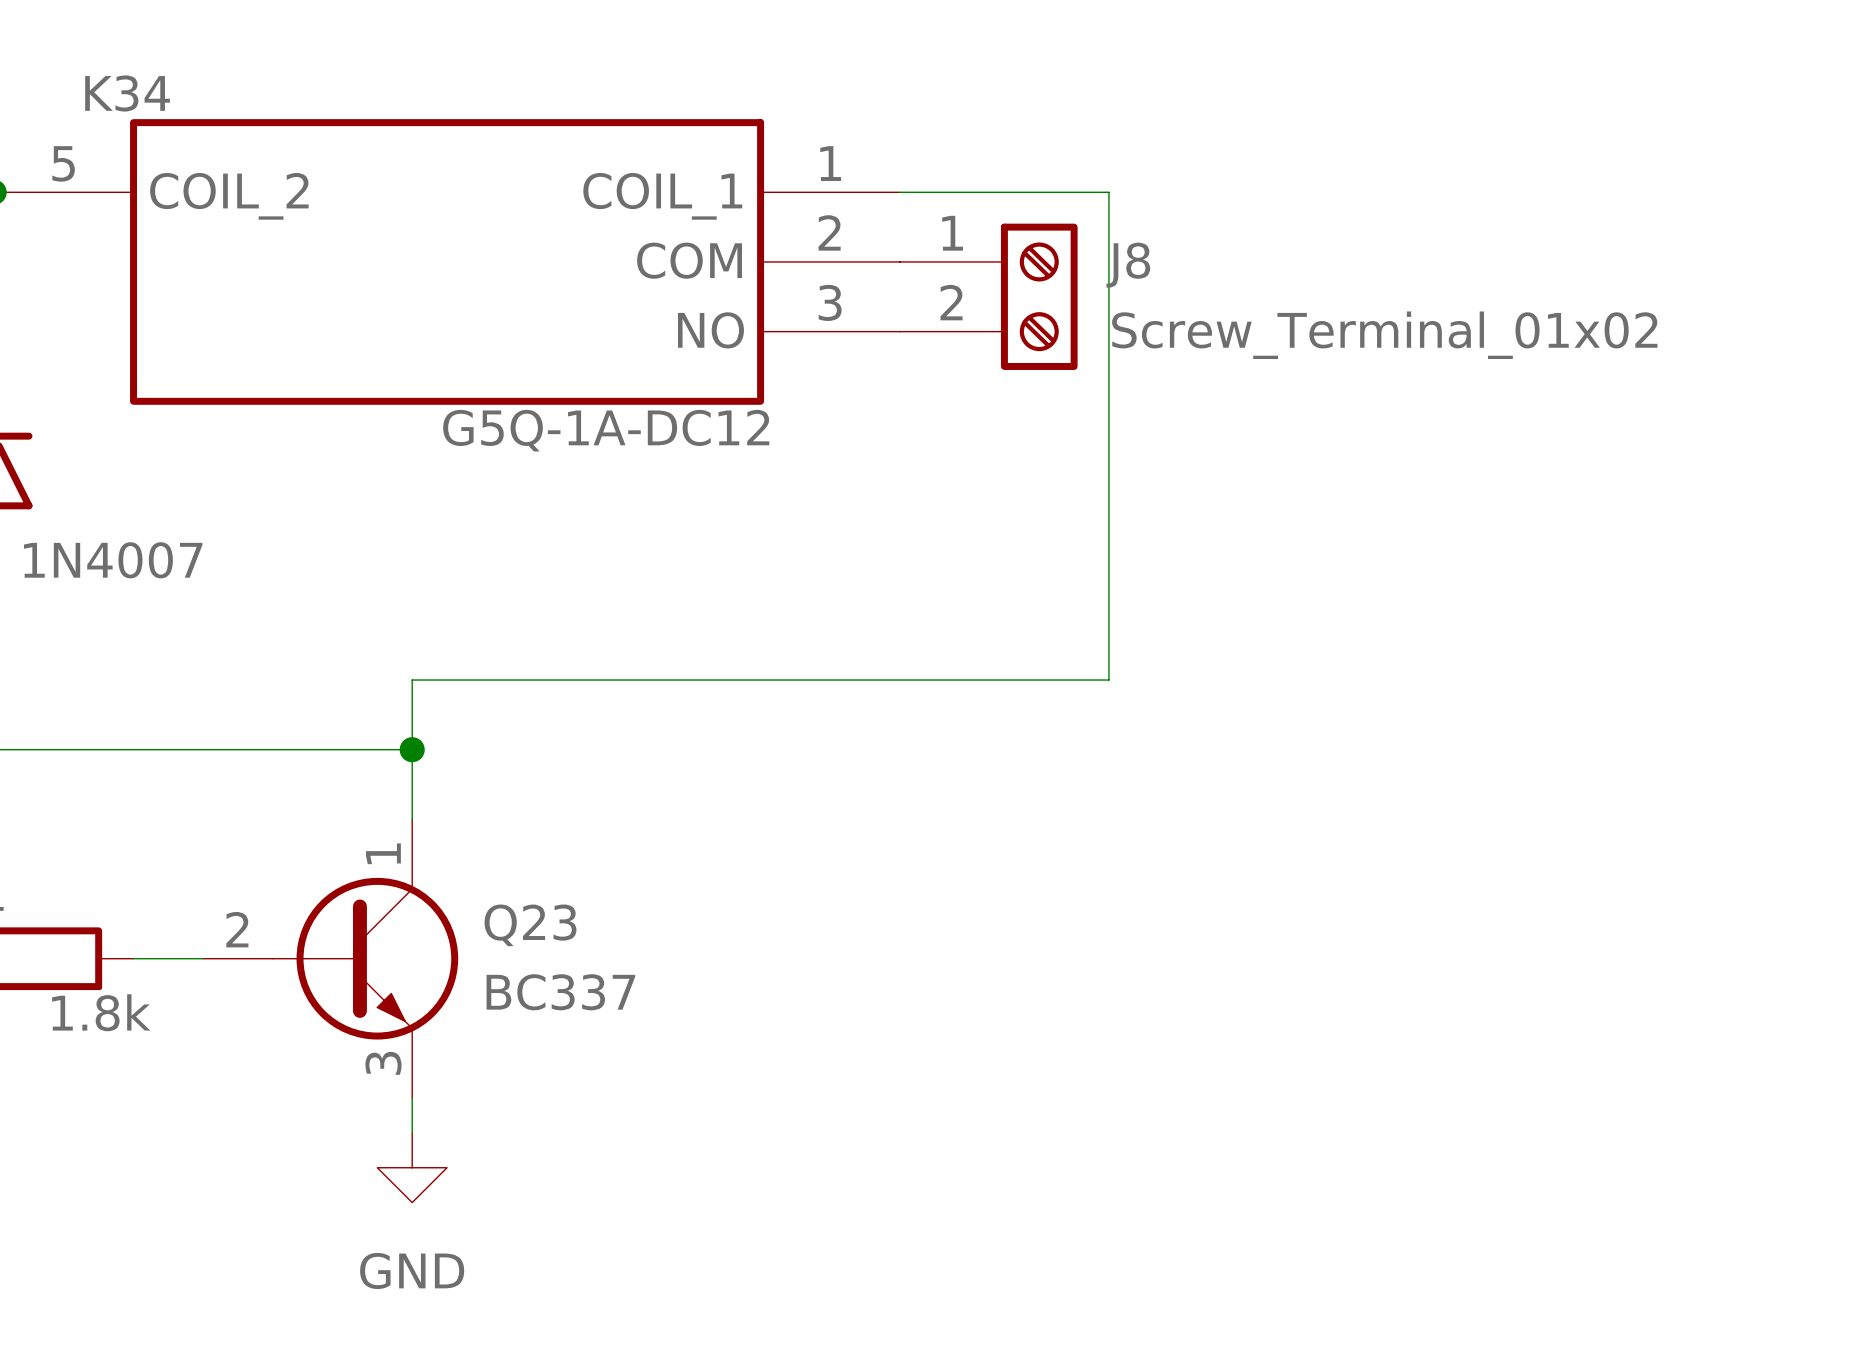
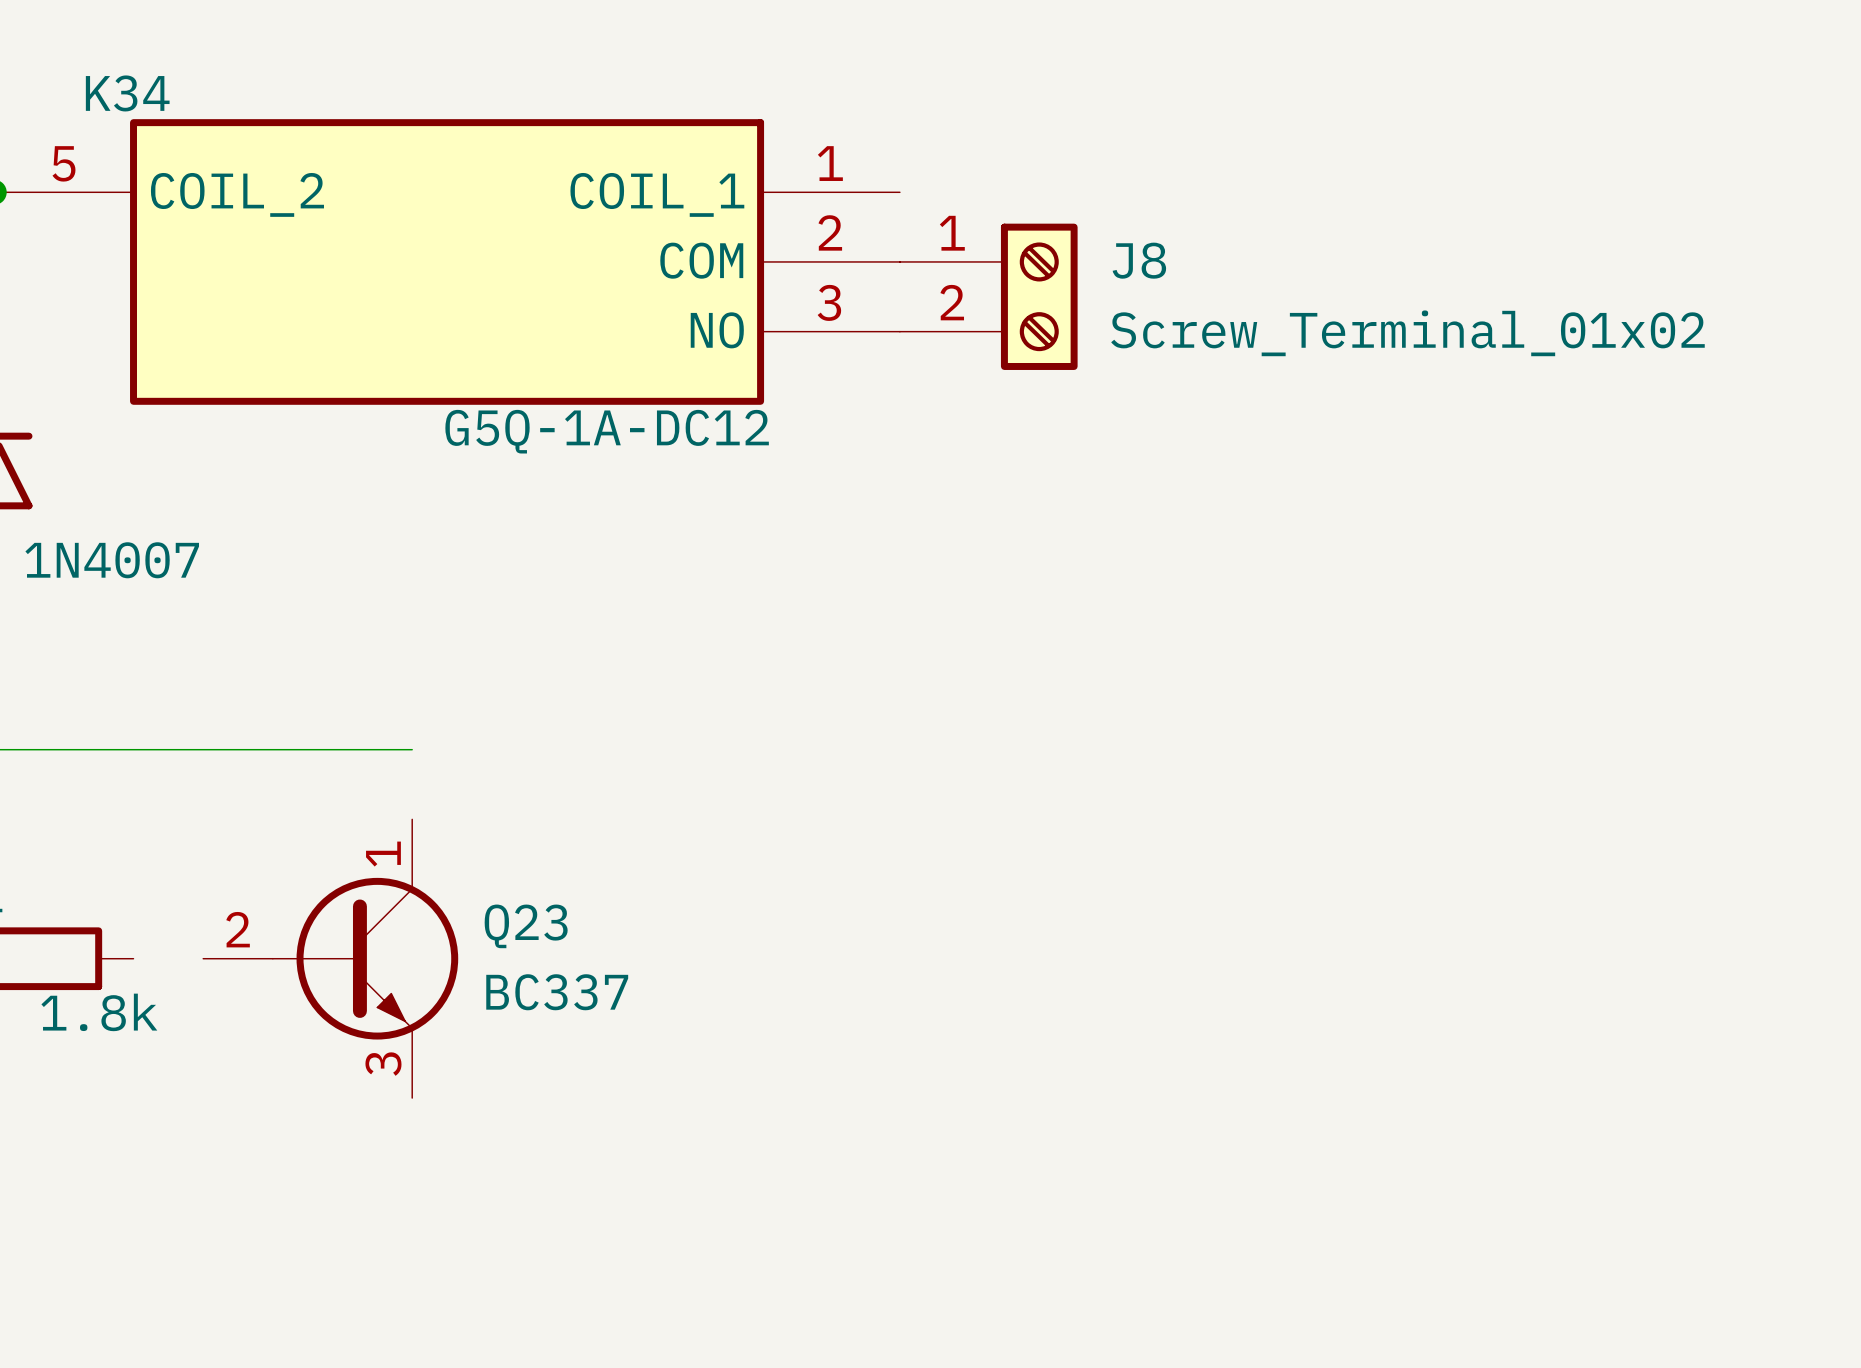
wire: (899, 192) (1108, 192) (1108, 680) (412, 680) (412, 819) -> none
junction: (412, 749) -> none
wire: (133, 958) (203, 958) -> none
wire: (412, 1098) (412, 1132) -> none
power symbol: GND (412, 1167) -> none

